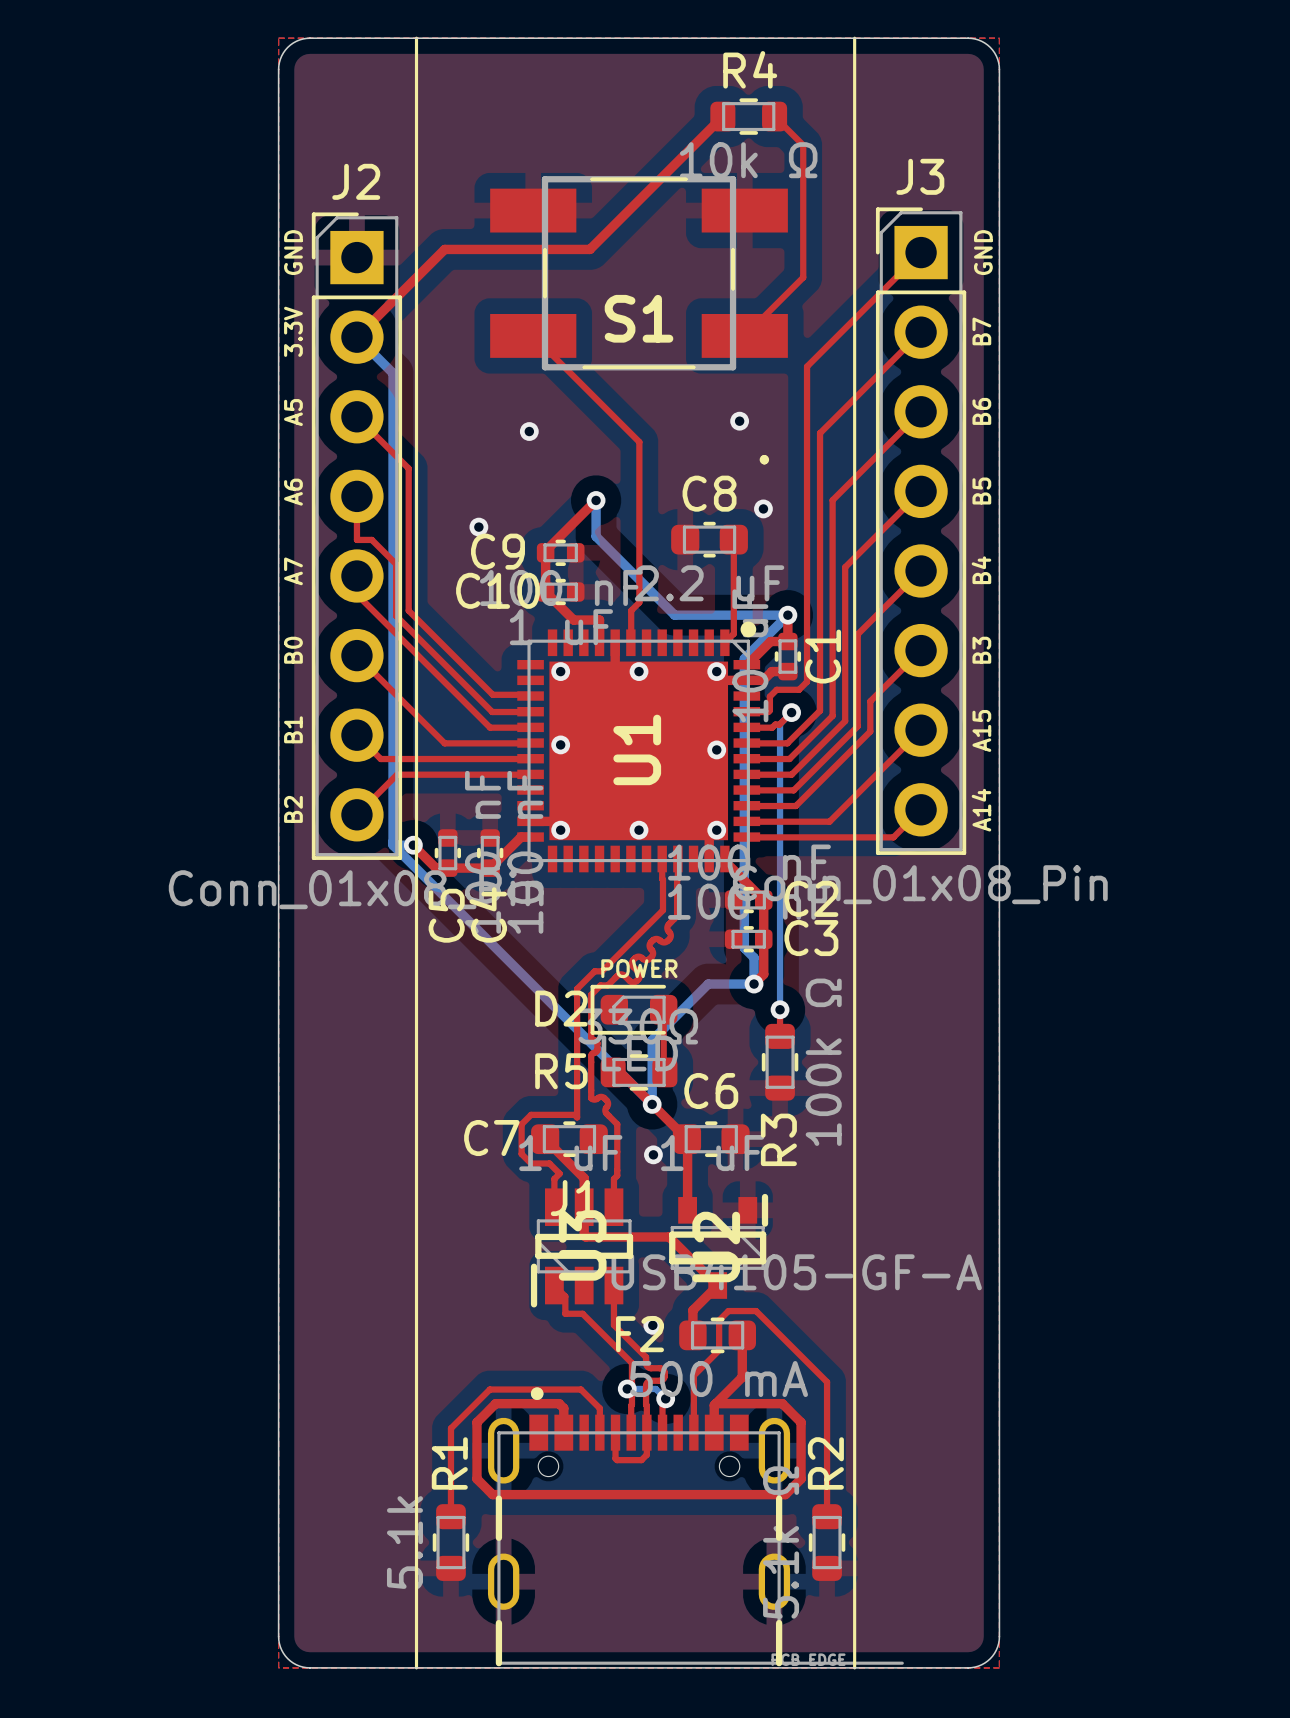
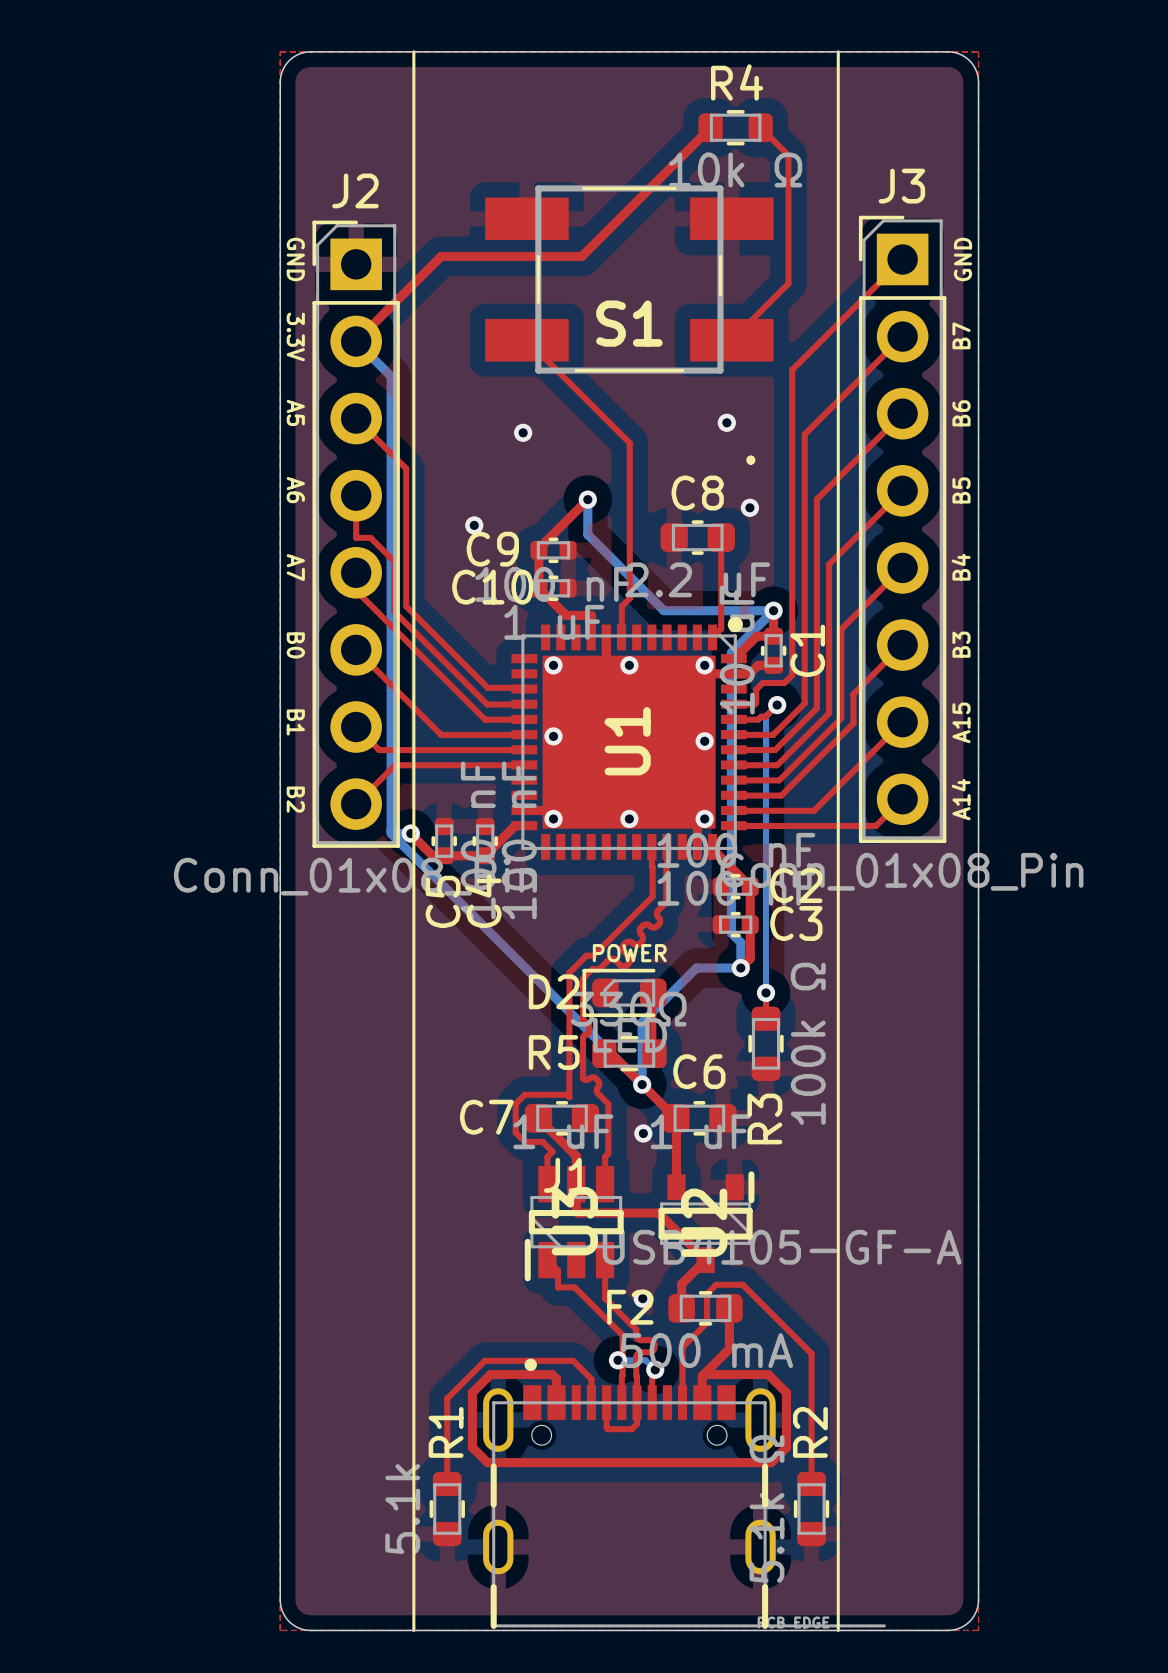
text rotation: 0° (293, 252) -> 180° (295, 259)
text rotation: 0° (293, 331) -> 180° (295, 336)
text rotation: 0° (293, 412) -> 180° (295, 412)
text rotation: 0° (293, 492) -> 180° (295, 490)
text rotation: 0° (293, 571) -> 180° (295, 567)
text rotation: 0° (293, 650) -> 180° (295, 645)
text rotation: 0° (293, 729) -> 180° (295, 722)
text rotation: 0° (293, 809) -> 180° (295, 799)

